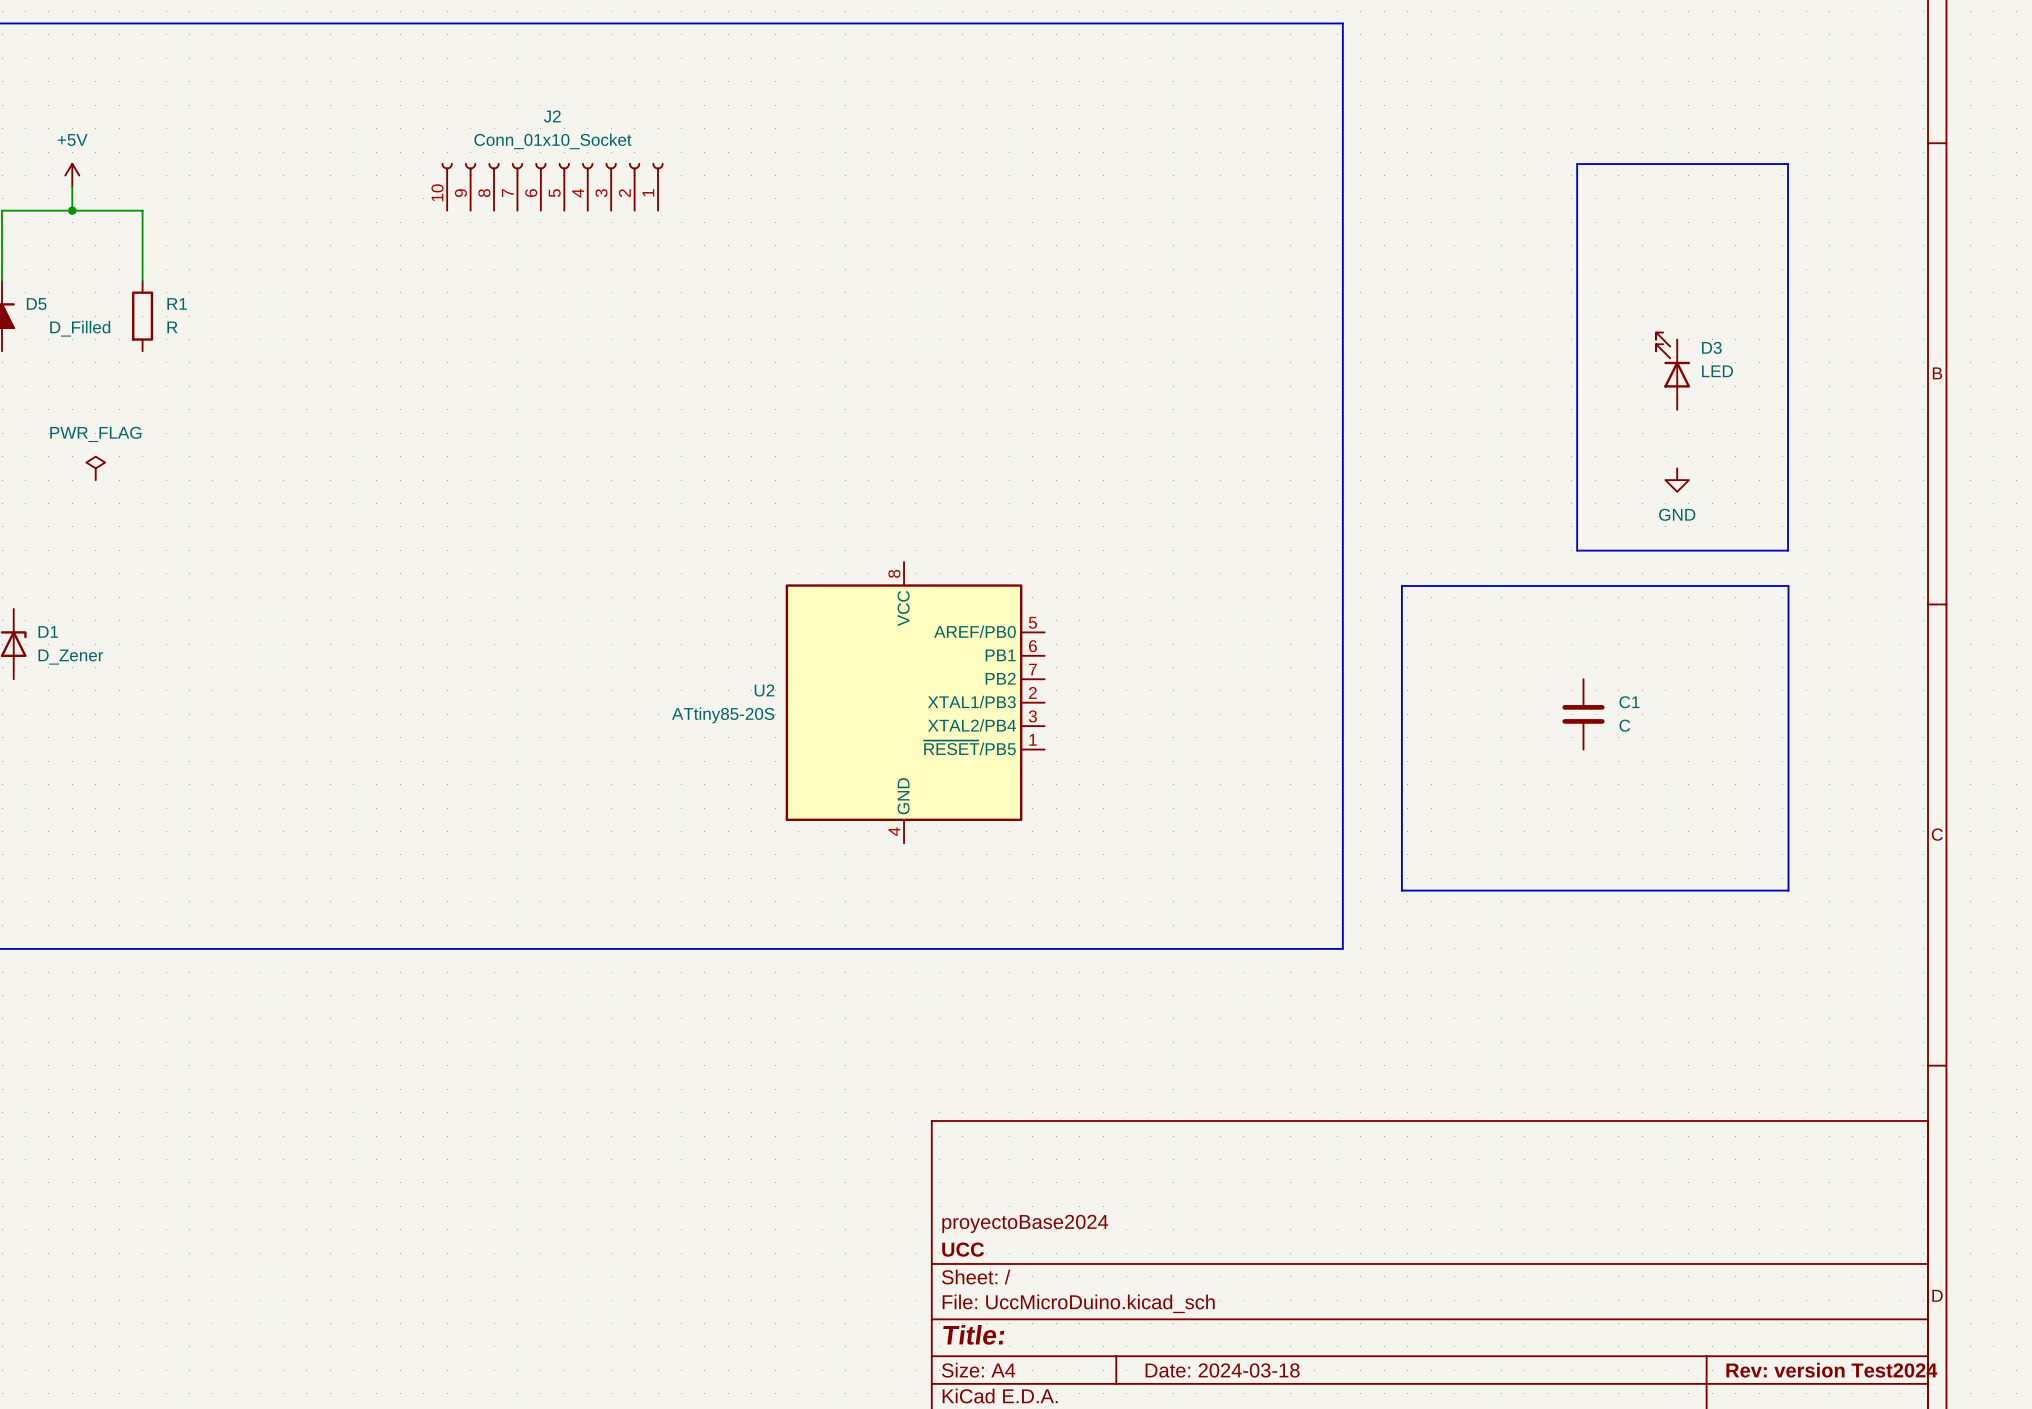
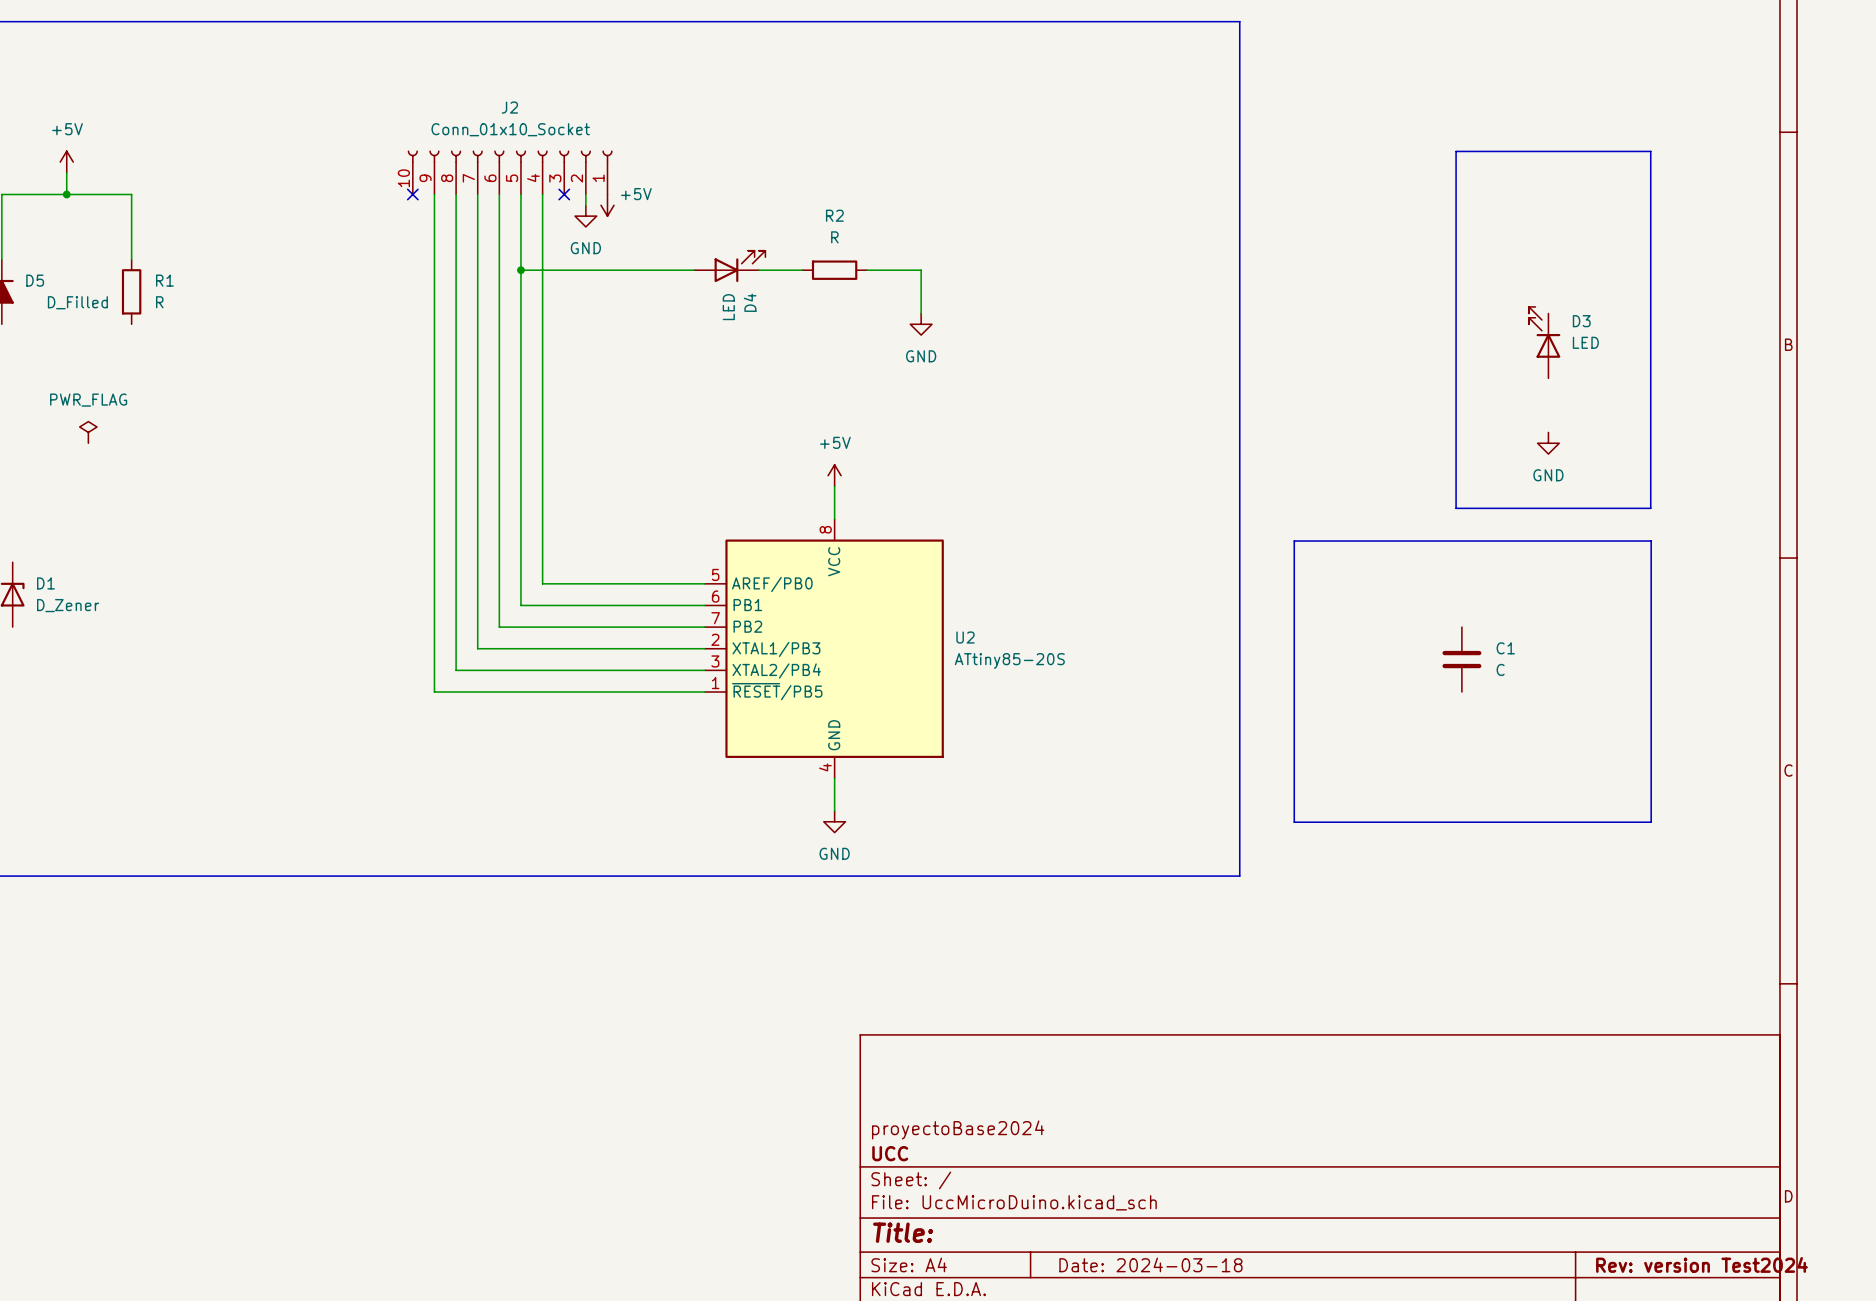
no-connect mark: none -> (412, 194)
wire: none -> (434, 194) (434, 691) (704, 691)
wire: none -> (456, 194) (456, 670) (704, 670)
wire: none -> (477, 194) (477, 648) (704, 648)
wire: none -> (499, 194) (499, 627) (704, 627)
wire: none -> (520, 194) (520, 605) (704, 605)
wire: none -> (542, 194) (542, 583) (704, 583)
no-connect mark: none -> (564, 194)
wire: none -> (585, 194) (585, 205)
power symbol: none -> +5V (607, 205)
power symbol: none -> GND (585, 216)
D4: none -> LED (729, 266)
wire: none -> (520, 270) (694, 270)
junction: none -> (520, 270)
wire: none -> (758, 270) (802, 270)
R2: none -> R (834, 270)
wire: none -> (867, 270) (921, 270) (921, 313)
power symbol: none -> GND (921, 324)
power symbol: none -> +5V (834, 475)
wire: none -> (834, 486) (834, 518)
U2 flip: as is (904, 702) -> left-right (834, 648)
wire: none -> (834, 778) (834, 810)
power symbol: none -> GND (834, 821)

